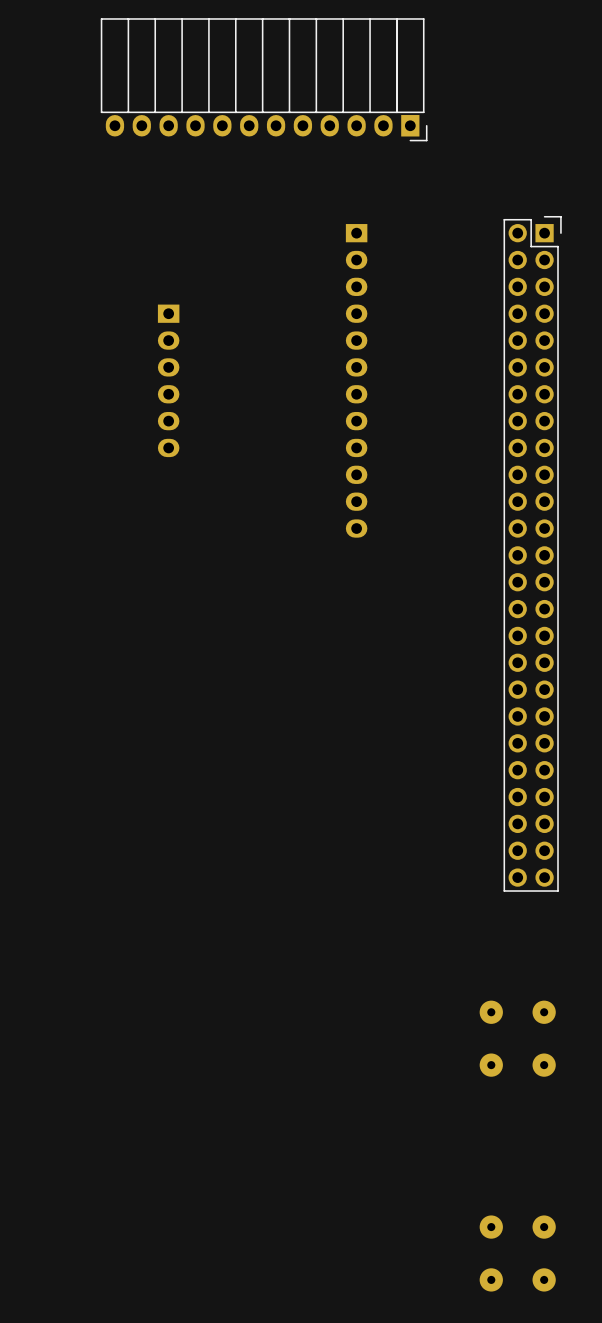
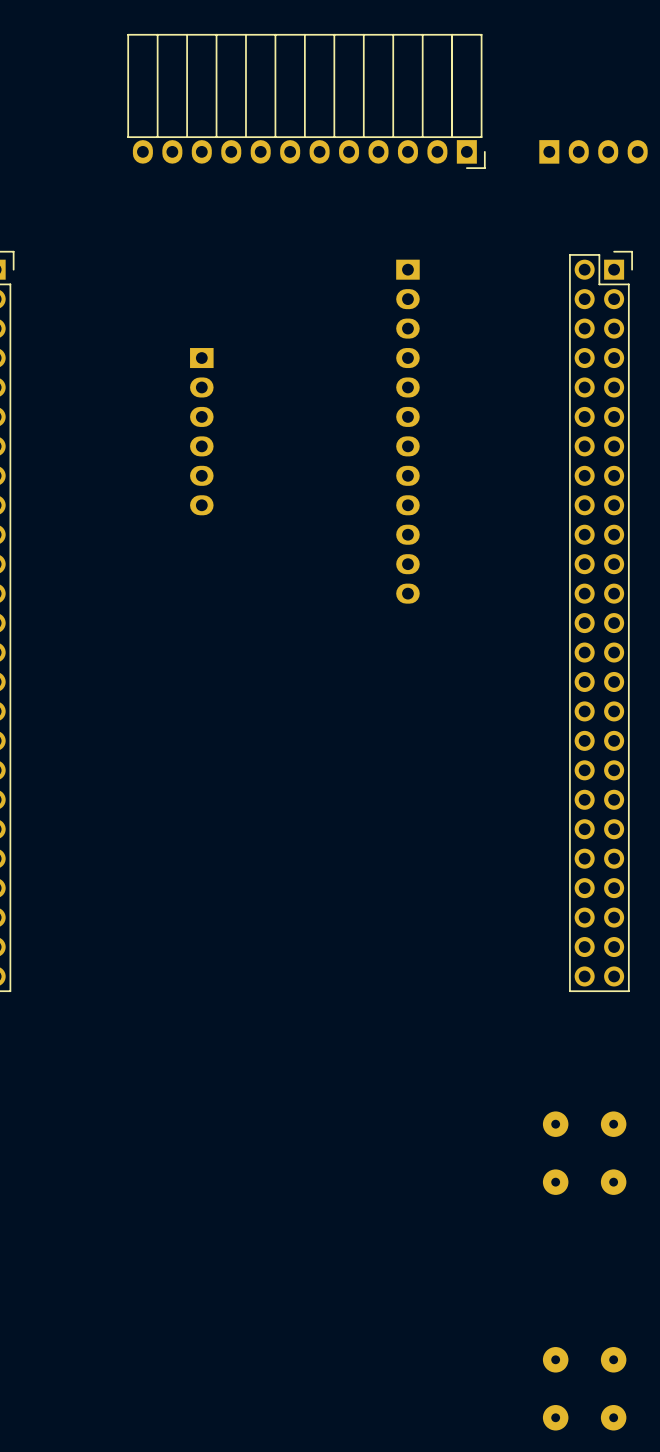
part: none -> (593, 151)

